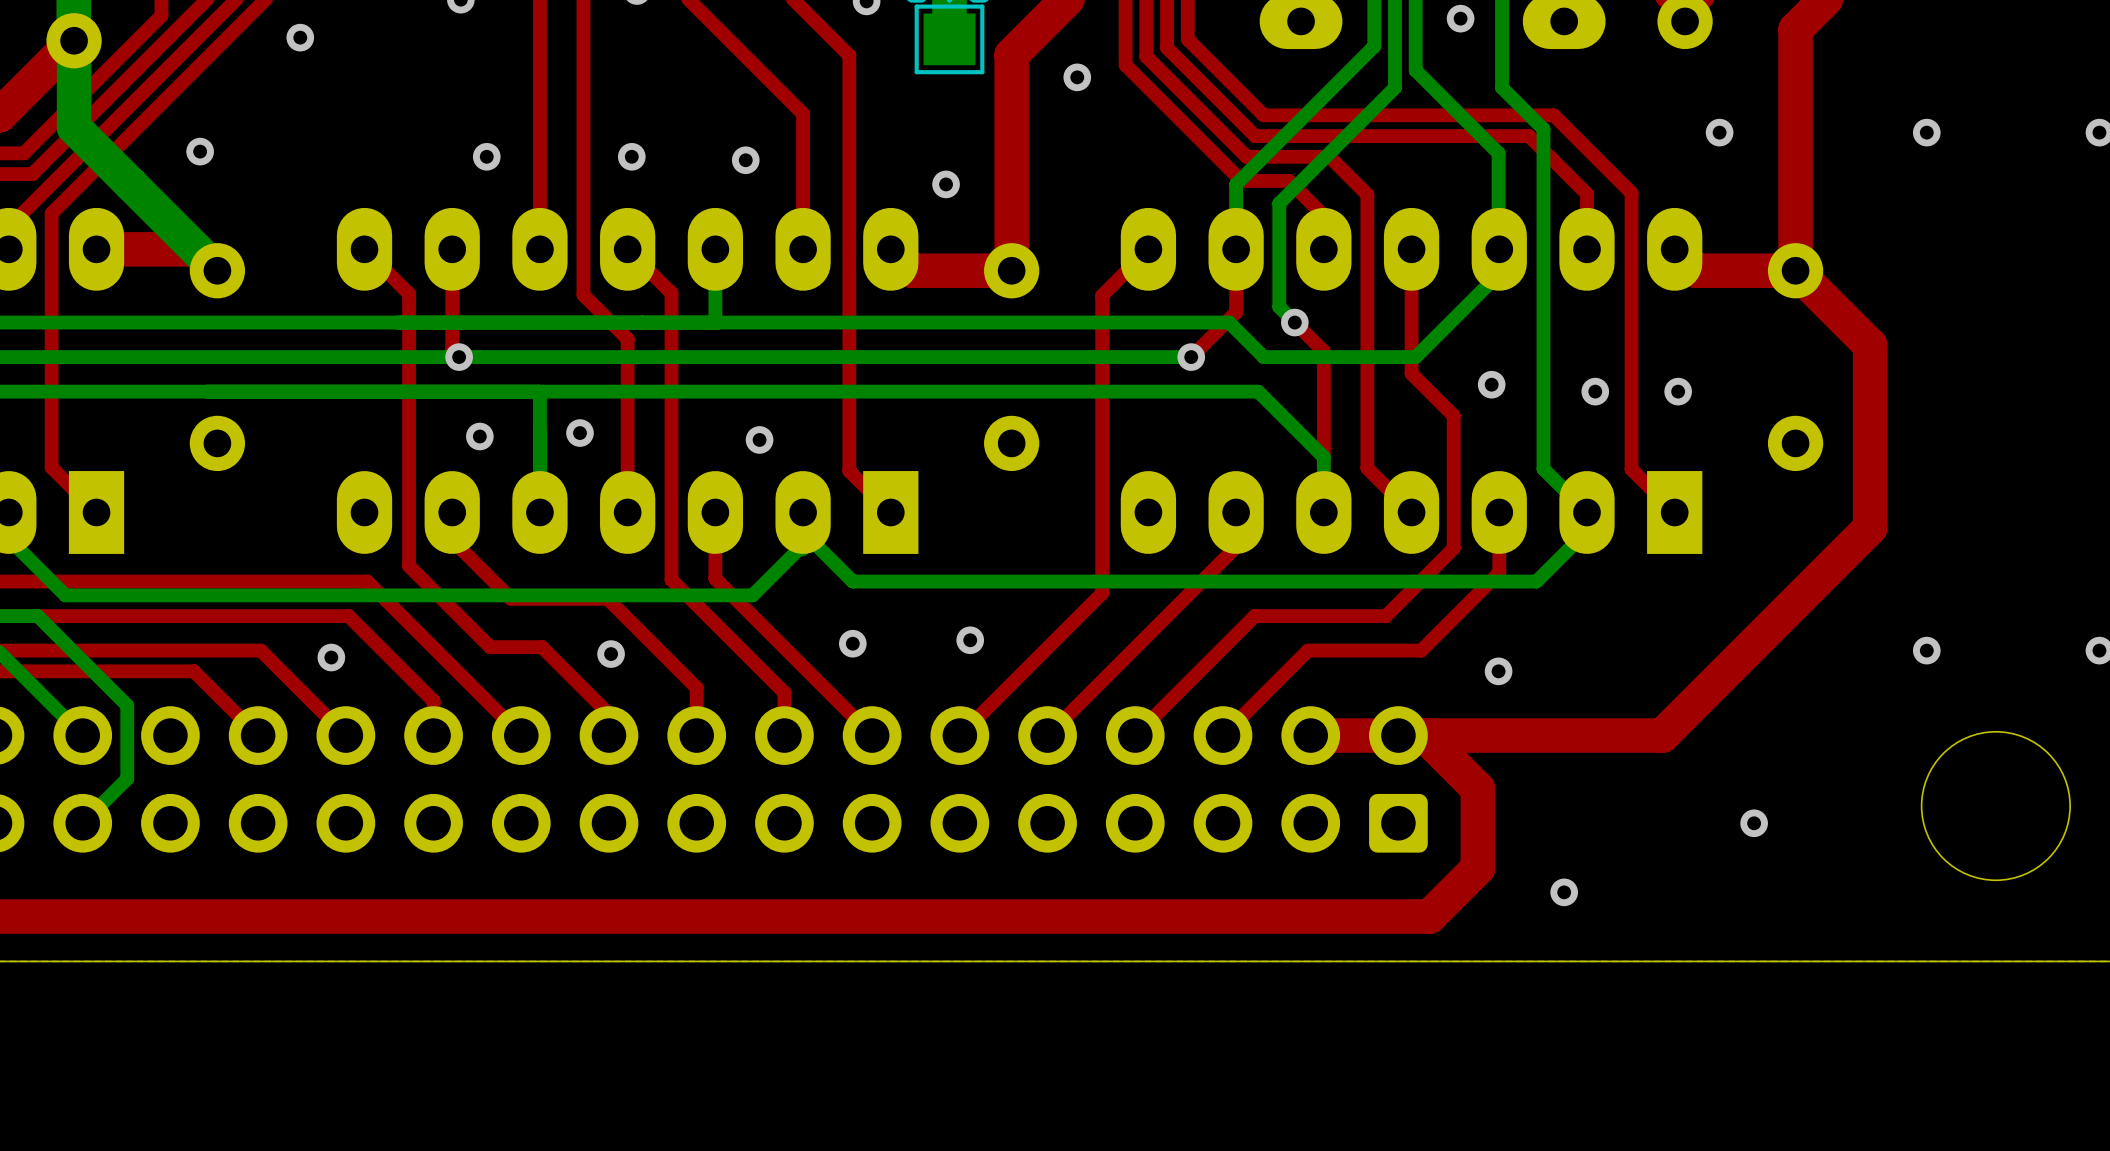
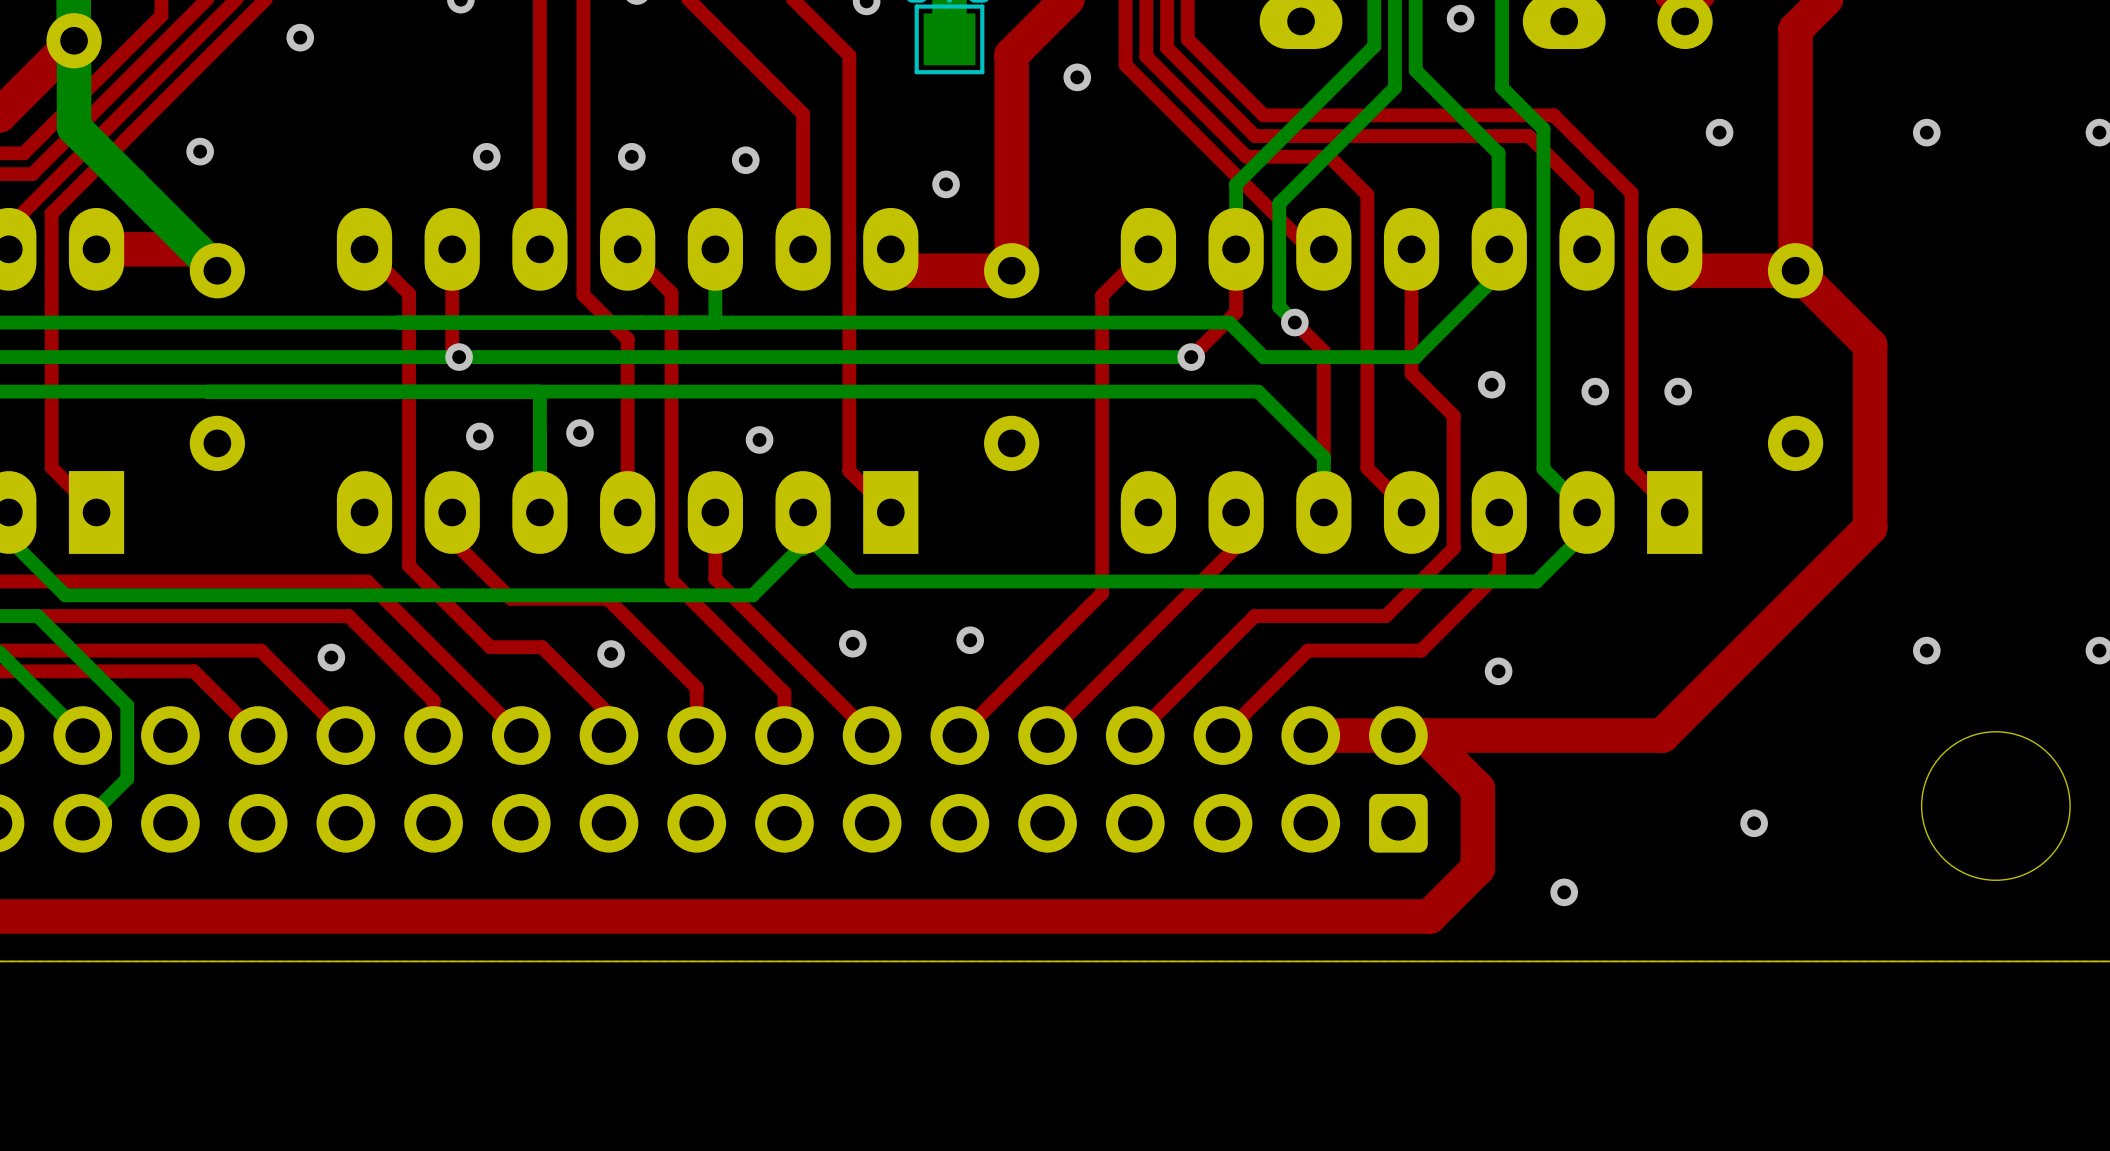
top track: (1241, 180) (1288, 180) (1323, 215) (1323, 249) -> (1241, 180) (1309, 249) (1323, 249)

